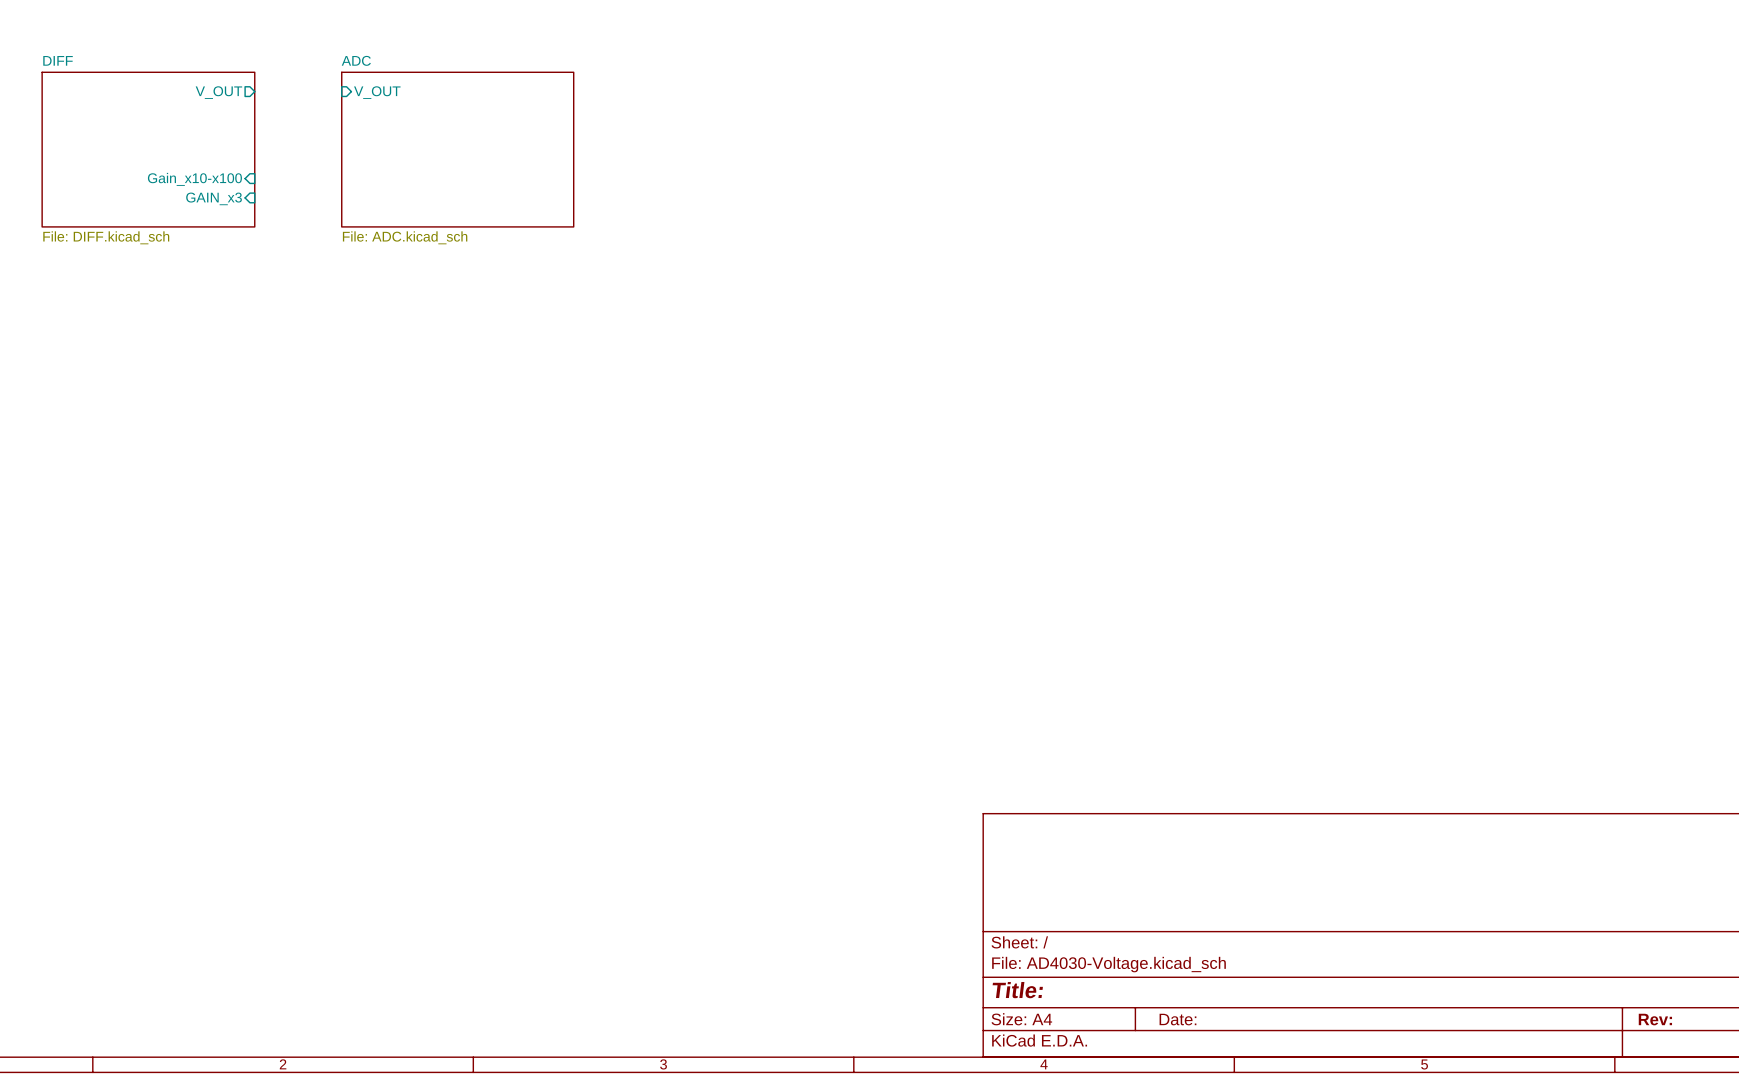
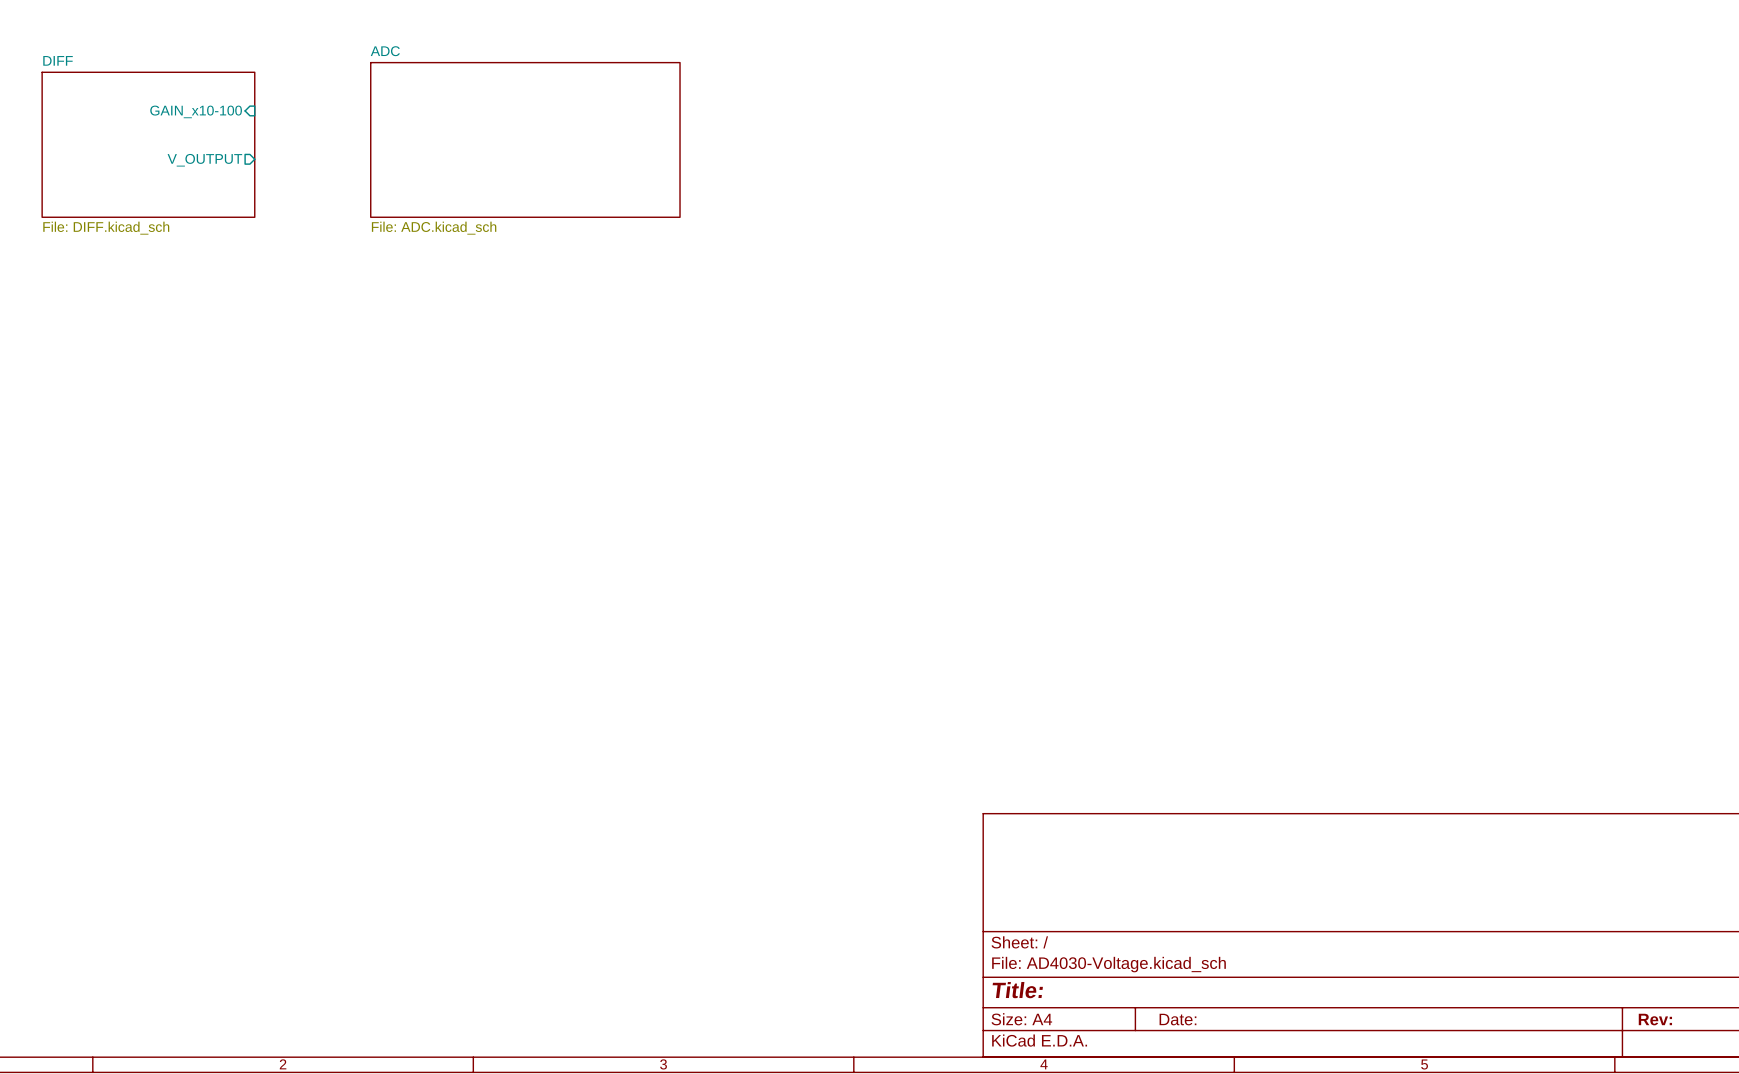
sheet DIFF shape: [41, 71, 256, 228] -> [41, 71, 256, 218]
sheet pin: V_OUT (218, 92) -> none
sheet pin: V_OUT (377, 92) -> none
sheet pin: none -> GAIN_x10-100 (196, 111)
sheet ADC: none -> File: ADC.kicad_sch (525, 139)
sheet ADC: File: ADC.kicad_sch (457, 149) -> none
sheet pin: none -> V_OUTPUT (204, 160)
sheet pin: Gain_x10-x100 (194, 179) -> none
sheet pin: GAIN_x3 (214, 198) -> none

